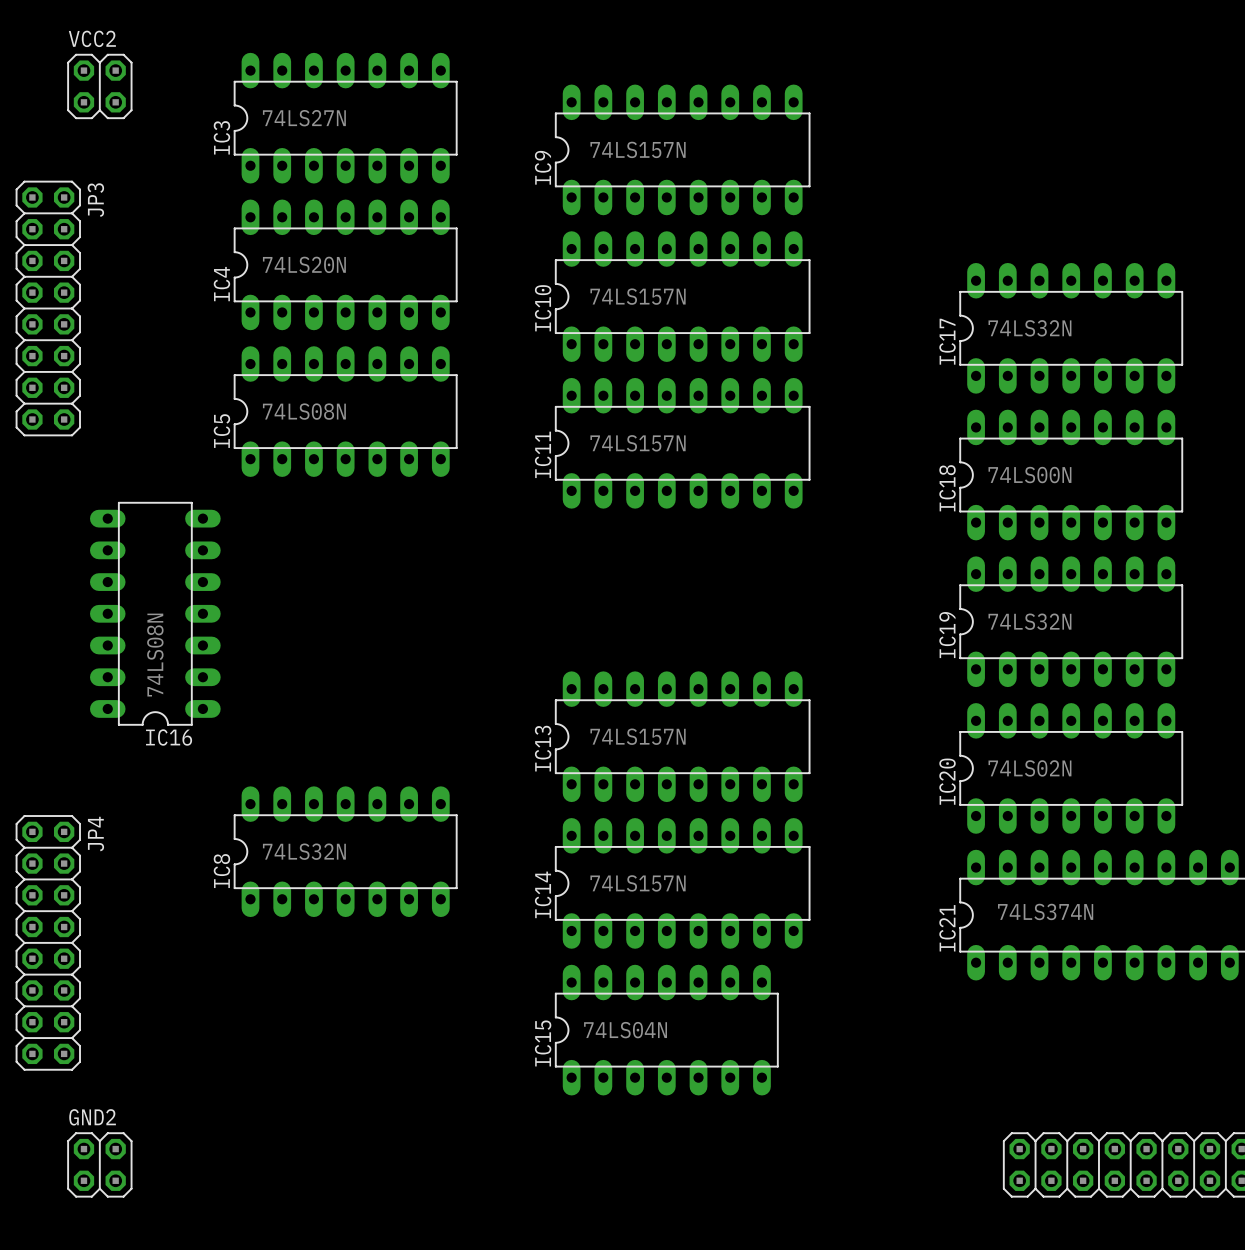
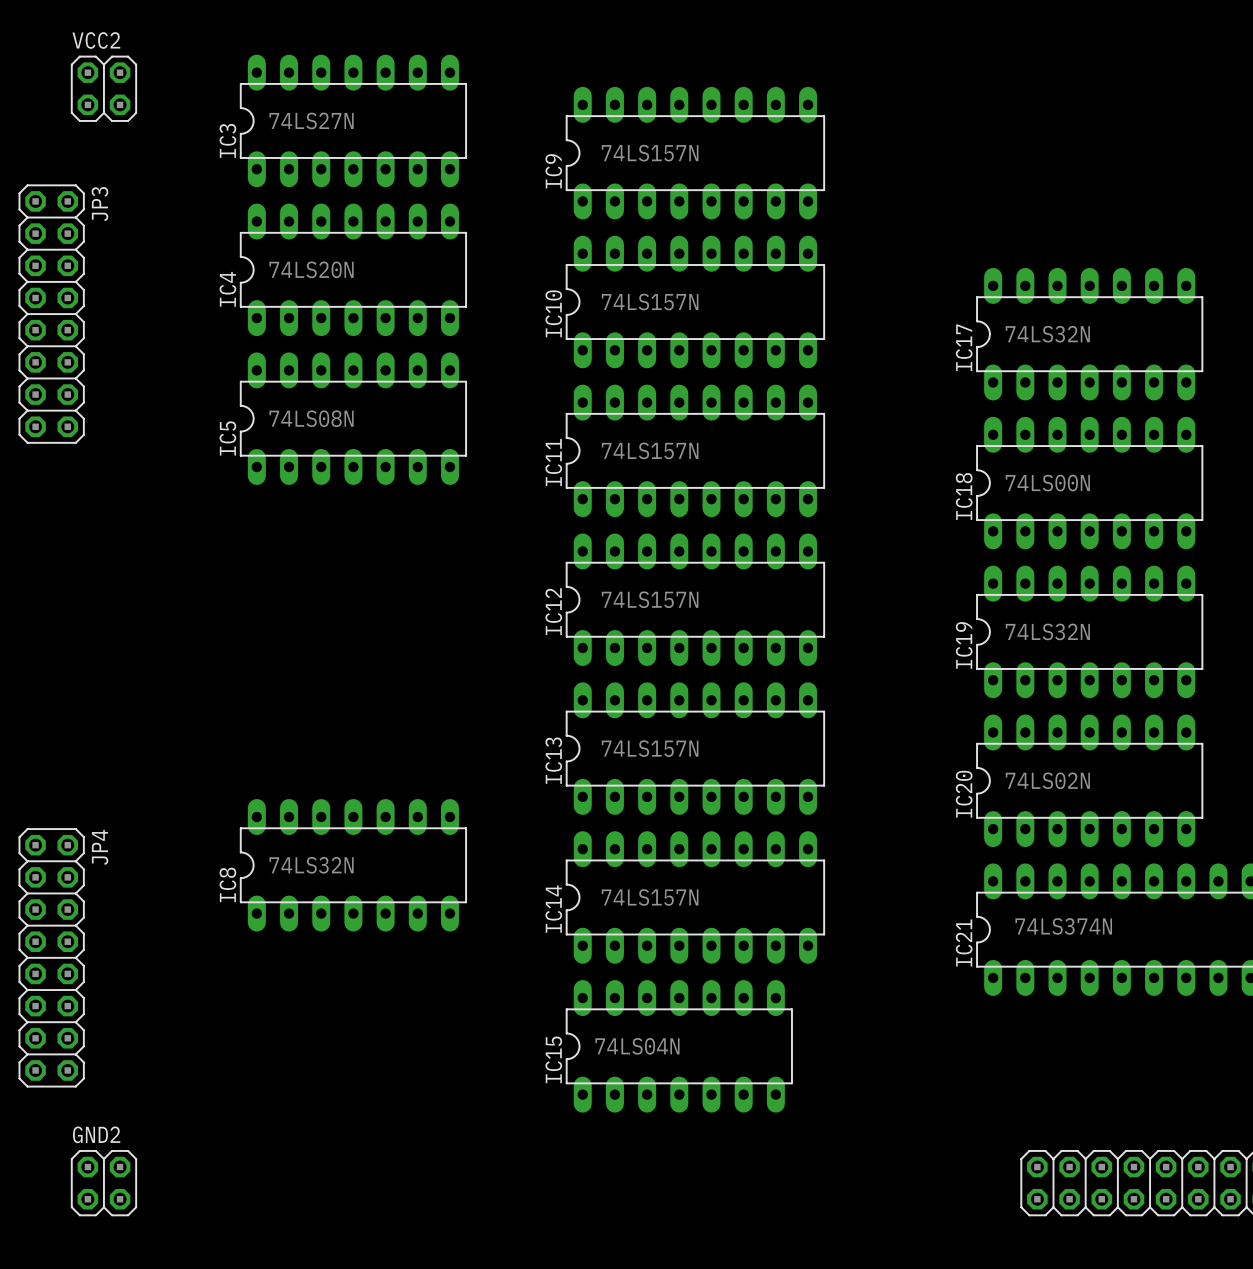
IC12: none -> 74LS157N (695, 599)
IC16: 74LS08N (155, 613) -> none

